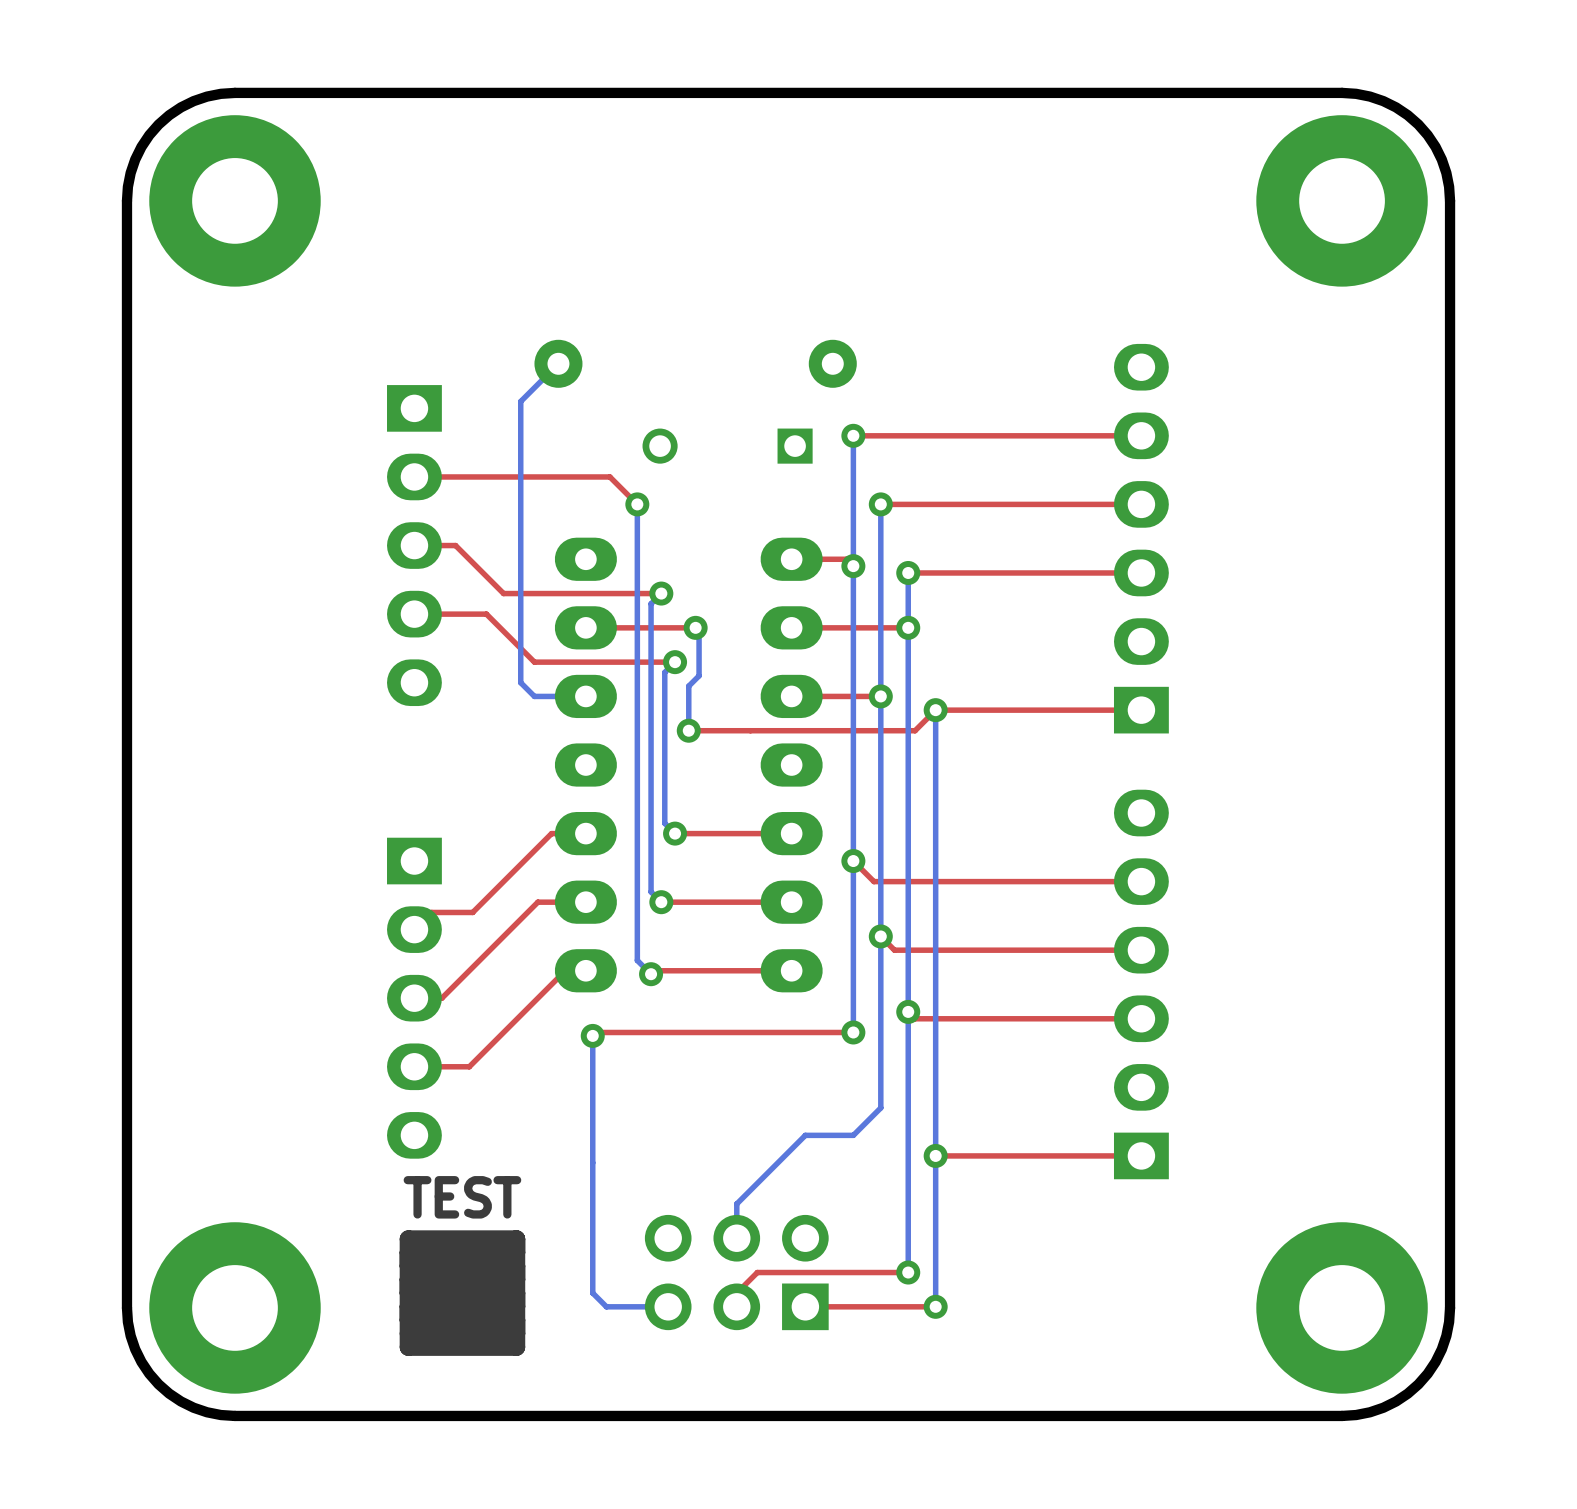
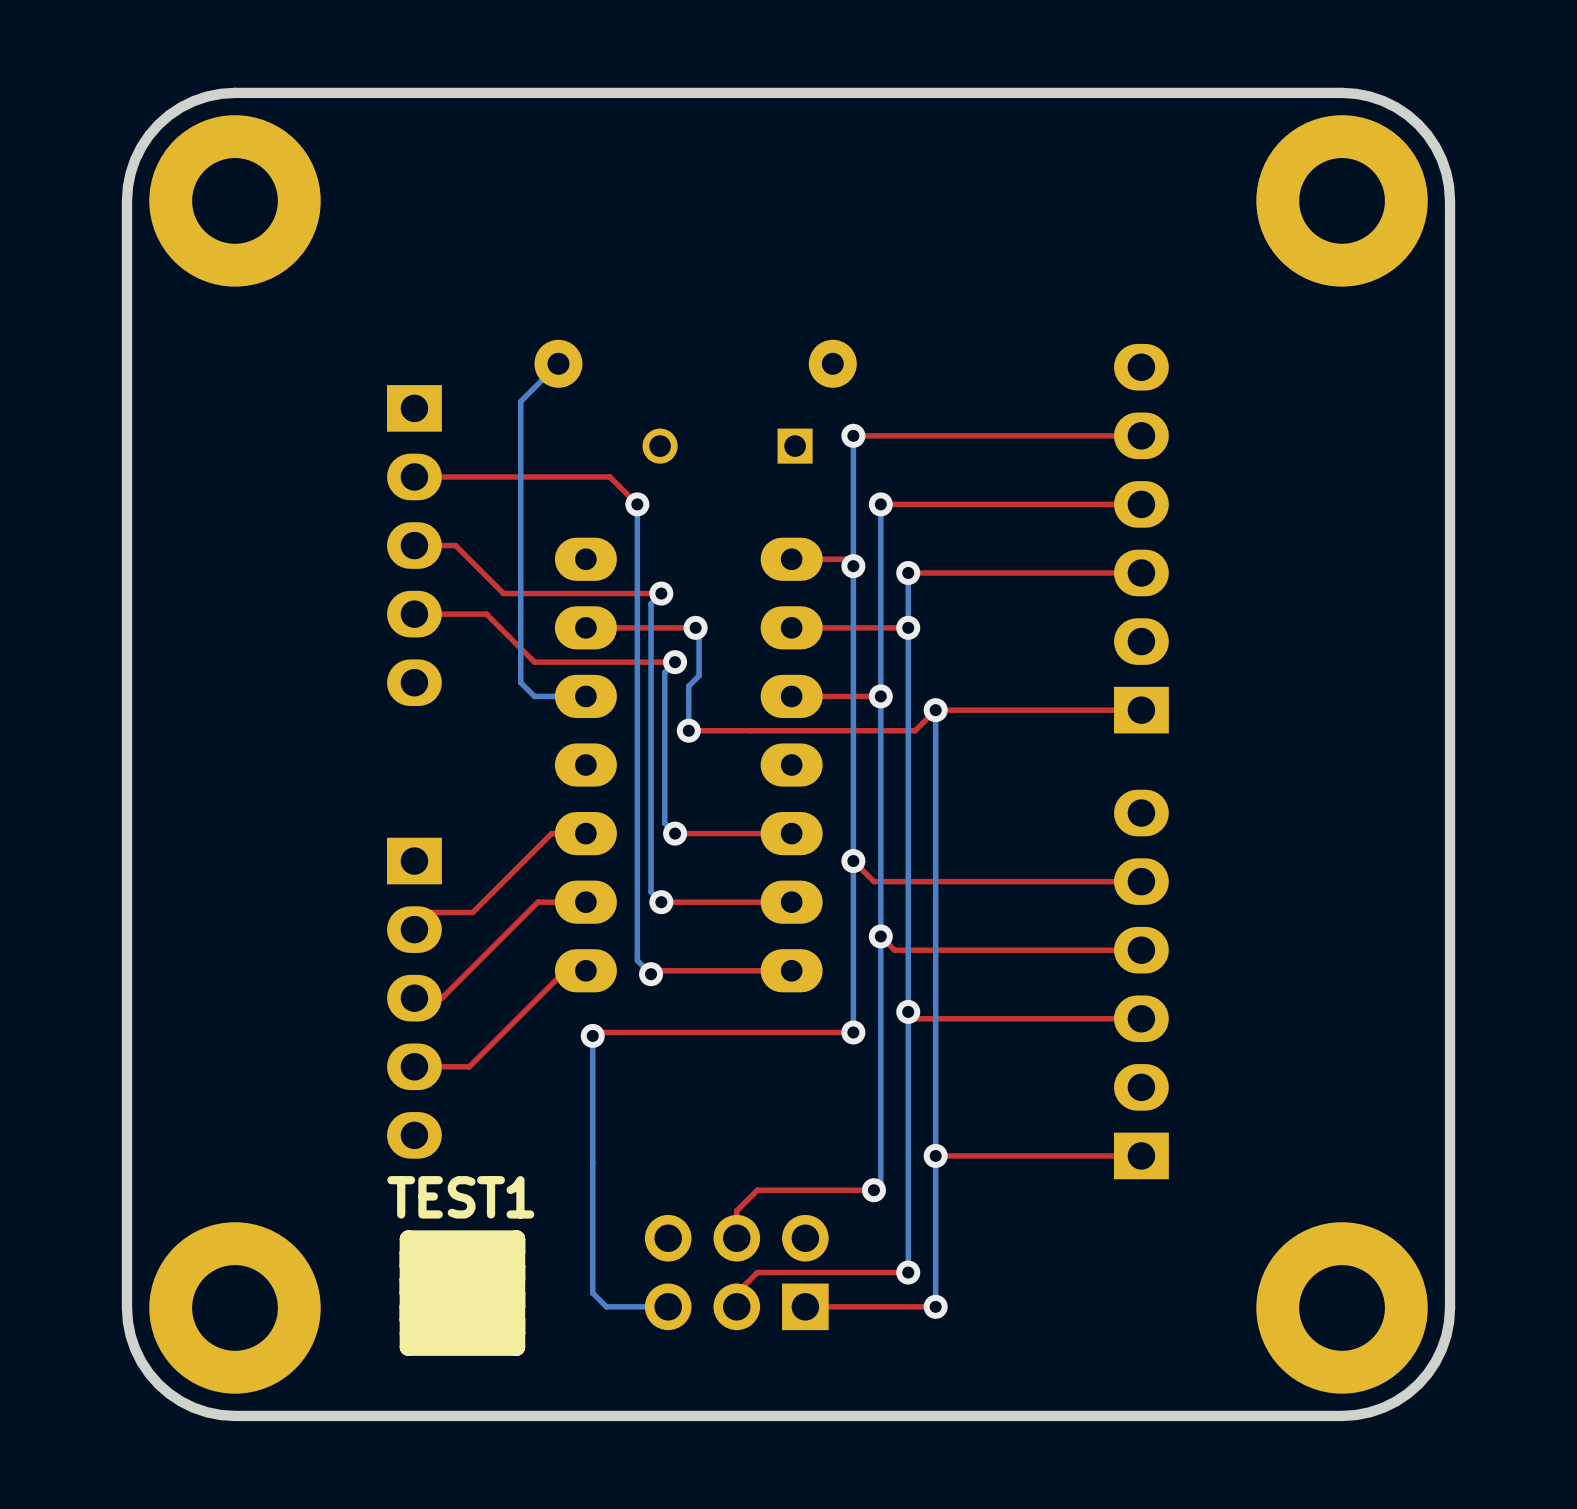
bottom track: (880, 1107) (853, 1135) (805, 1135) (736, 1203) (736, 1238) -> (880, 1107) (880, 1183) (873, 1190)
top track: none -> (873, 1190) (757, 1190) (736, 1210) (736, 1238)
via: none -> (873, 1190)
TEST name: TEST (462, 1197) -> TEST1 (460, 1197)

